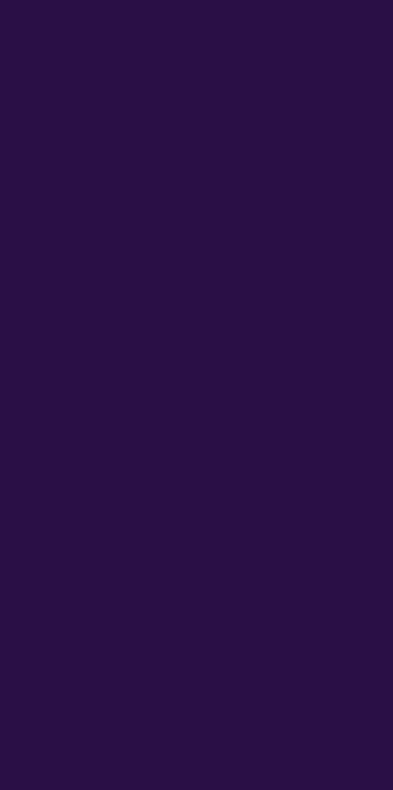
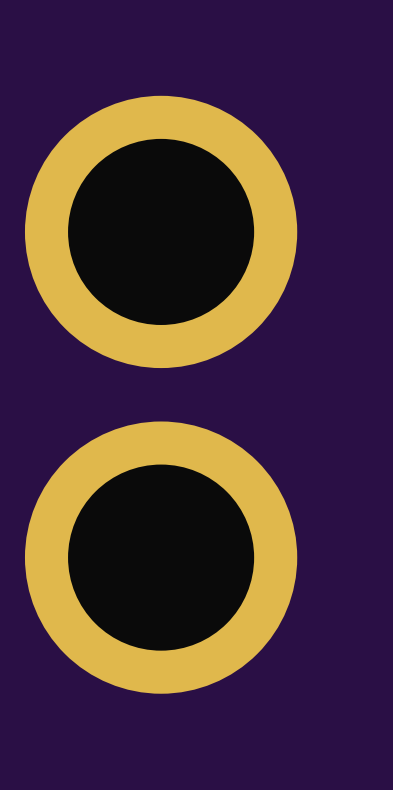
part: none -> (161, 231)
part: none -> (161, 557)

